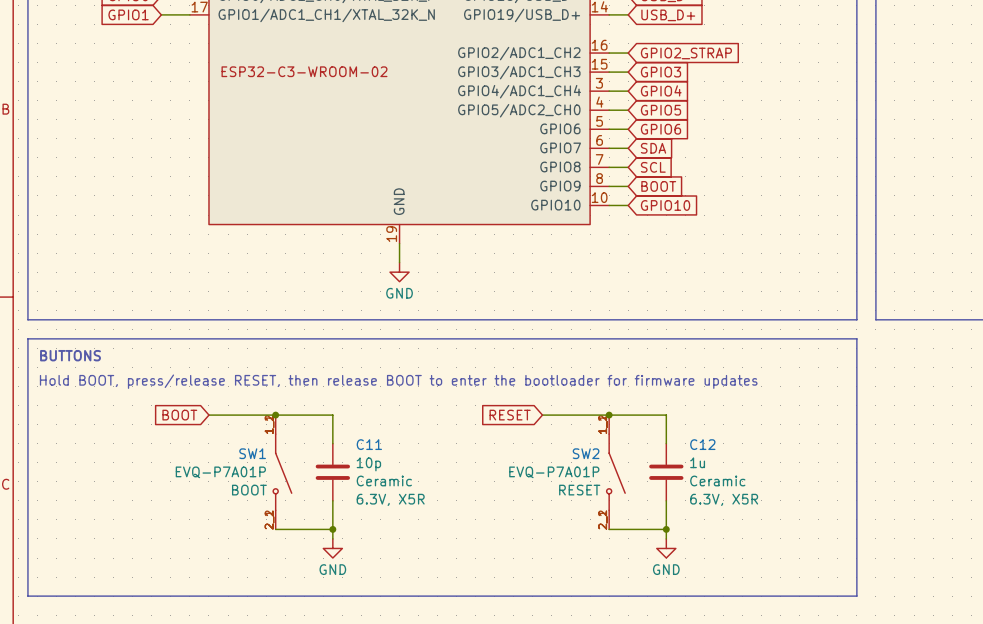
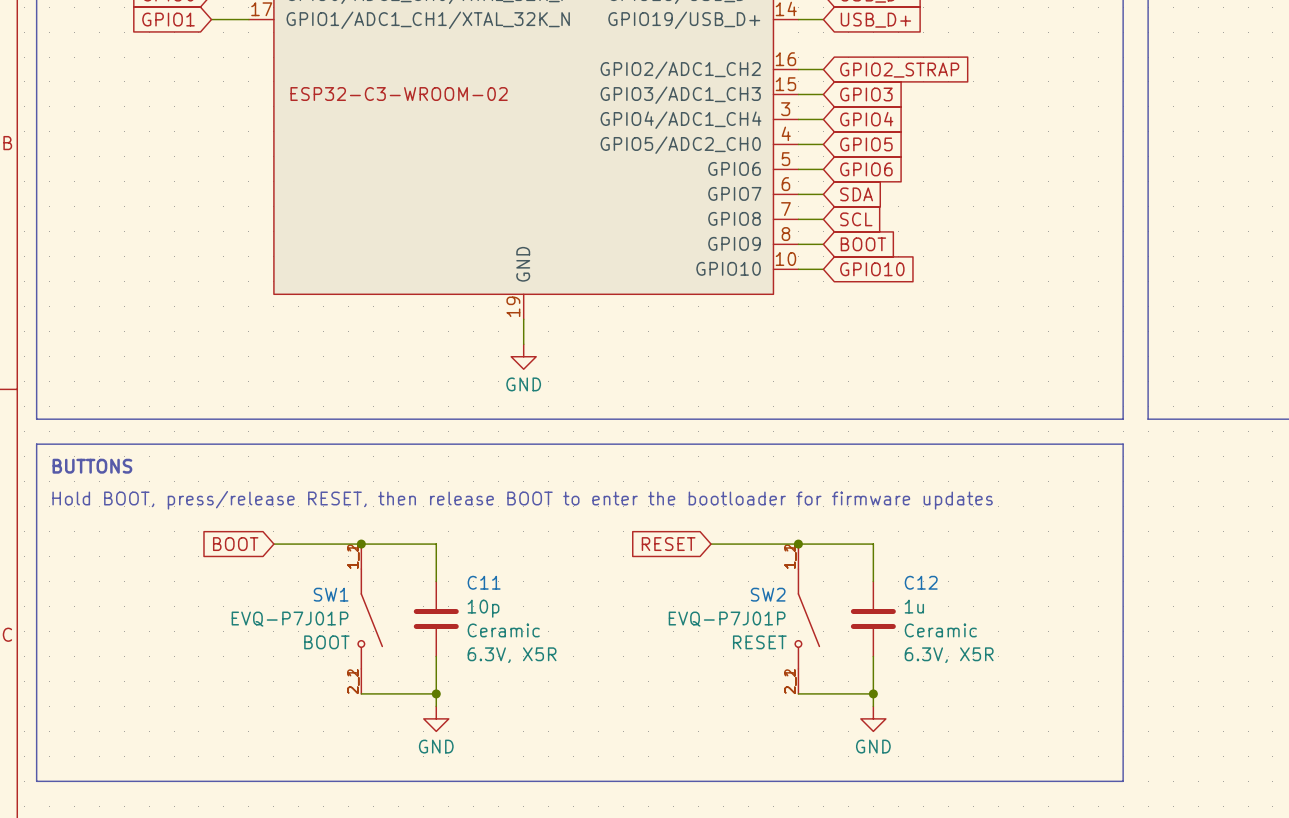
SW1 value: EVQ-P7A01P (220, 472) -> EVQ-P7J01P (290, 619)
SW2 value: EVQ-P7A01P (554, 472) -> EVQ-P7J01P (727, 619)

